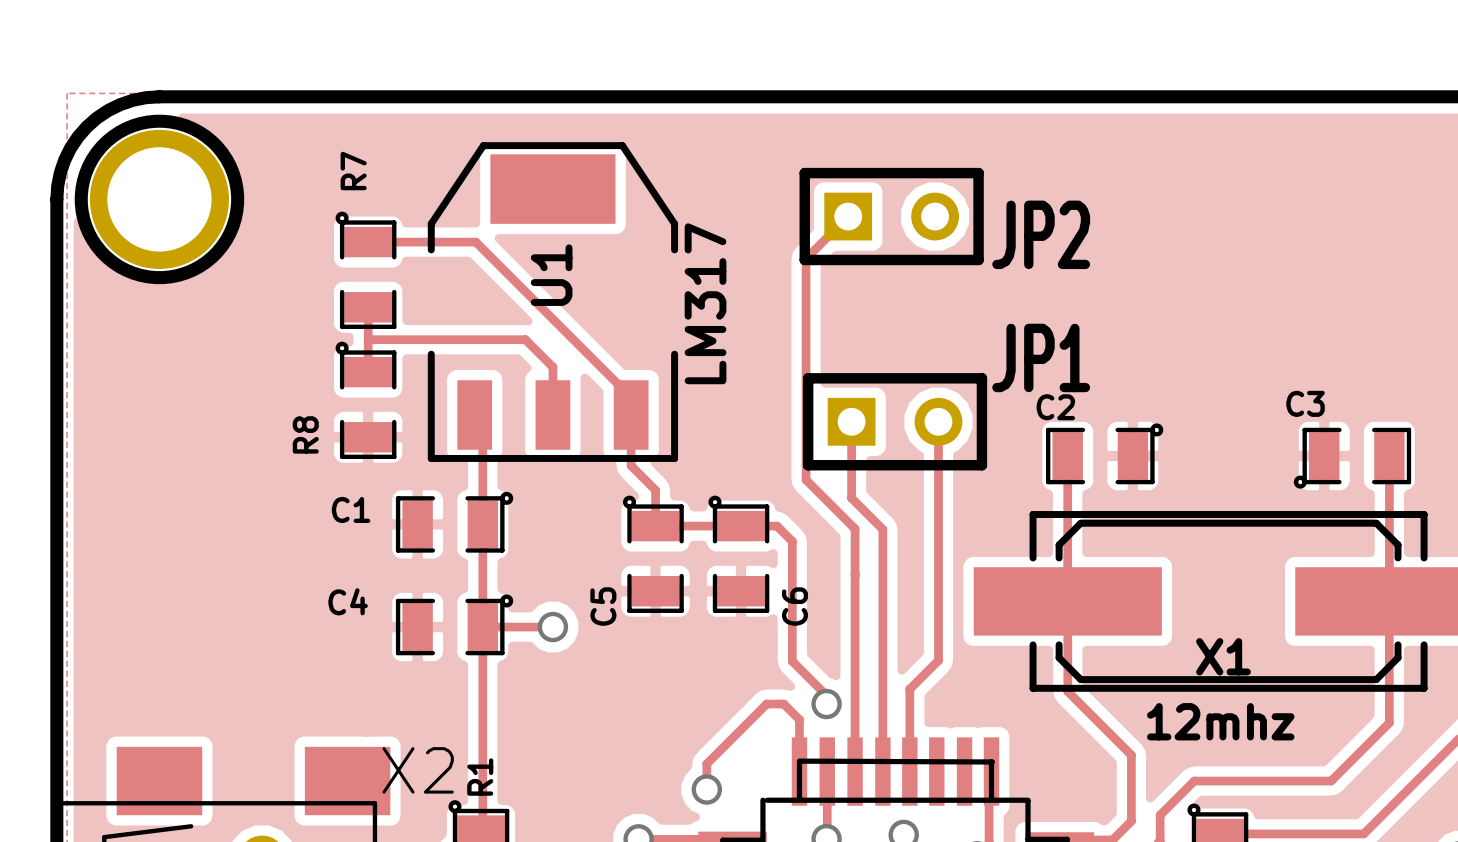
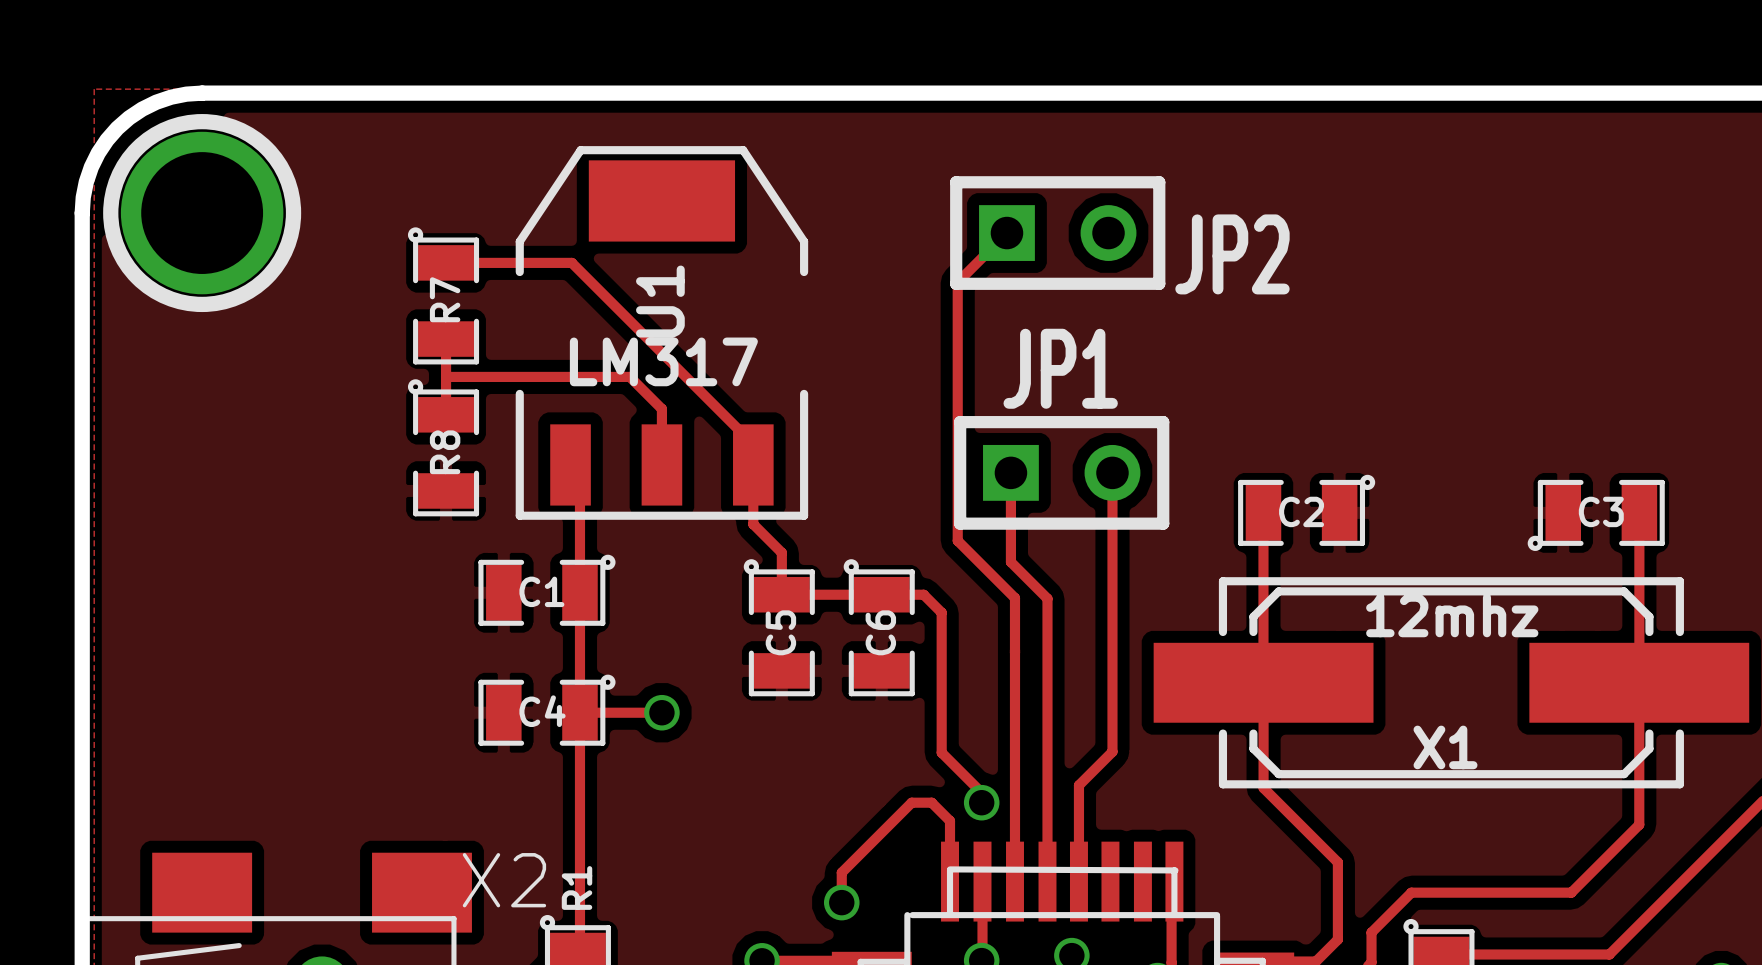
R7 name position: R7 (353, 171) -> R7 (445, 299)
U1 value rotation: 0° (705, 303) -> 90° clockwise (663, 361)
JP1 name position: JP1 (1041, 357) -> JP1 (1060, 368)
C3 name position: C3 (1305, 403) -> C3 (1601, 511)
C2 name position: C2 (1055, 407) -> C2 (1301, 511)
R8 name position: R8 (305, 434) -> R8 (445, 452)
C1 name position: C1 (351, 509) -> C1 (541, 591)
C4 name position: C4 (348, 601) -> C4 (542, 711)
C5 name position: C5 (603, 606) -> C5 (780, 632)
C6 name position: C6 (794, 606) -> C6 (880, 632)
X1 value position: 12mhz (1220, 721) -> 12mhz (1452, 615)

